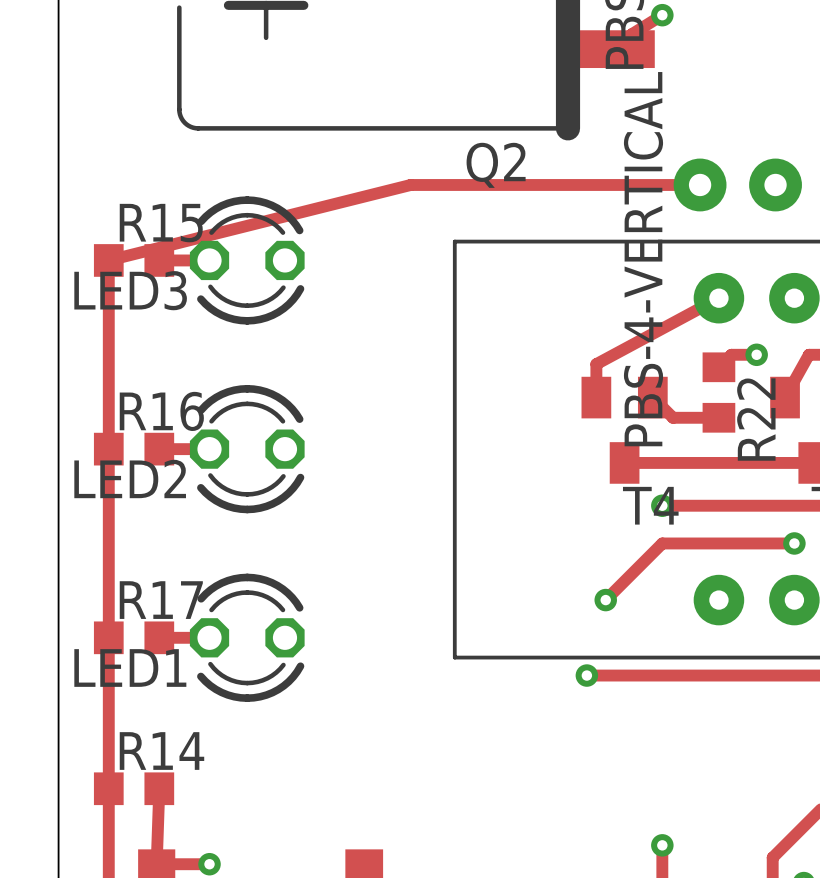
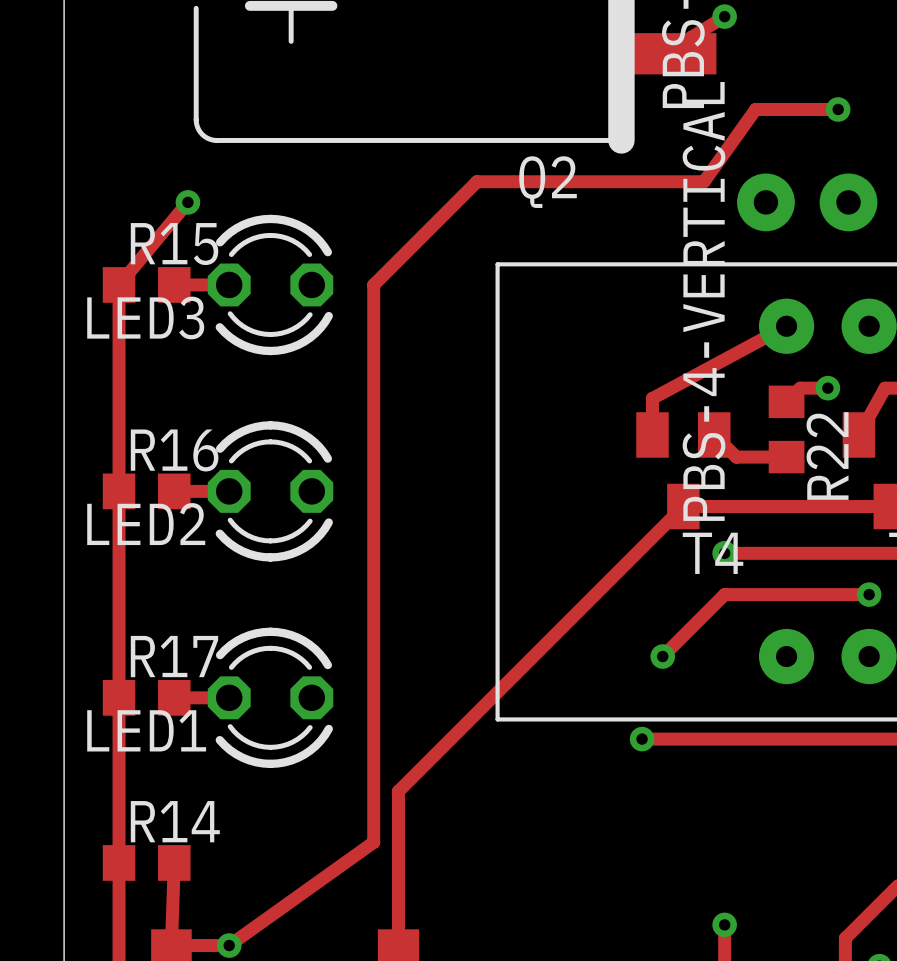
track: none -> (838, 109) (755, 109) (704, 181) (476, 181) (373, 284) (373, 842) (229, 945)
via: none -> (838, 109)
via: none -> (187, 202)
track: (700, 184) (410, 184) (108, 260) -> (187, 202) (119, 284)
track: none -> (683, 506) (398, 791) (398, 945)

